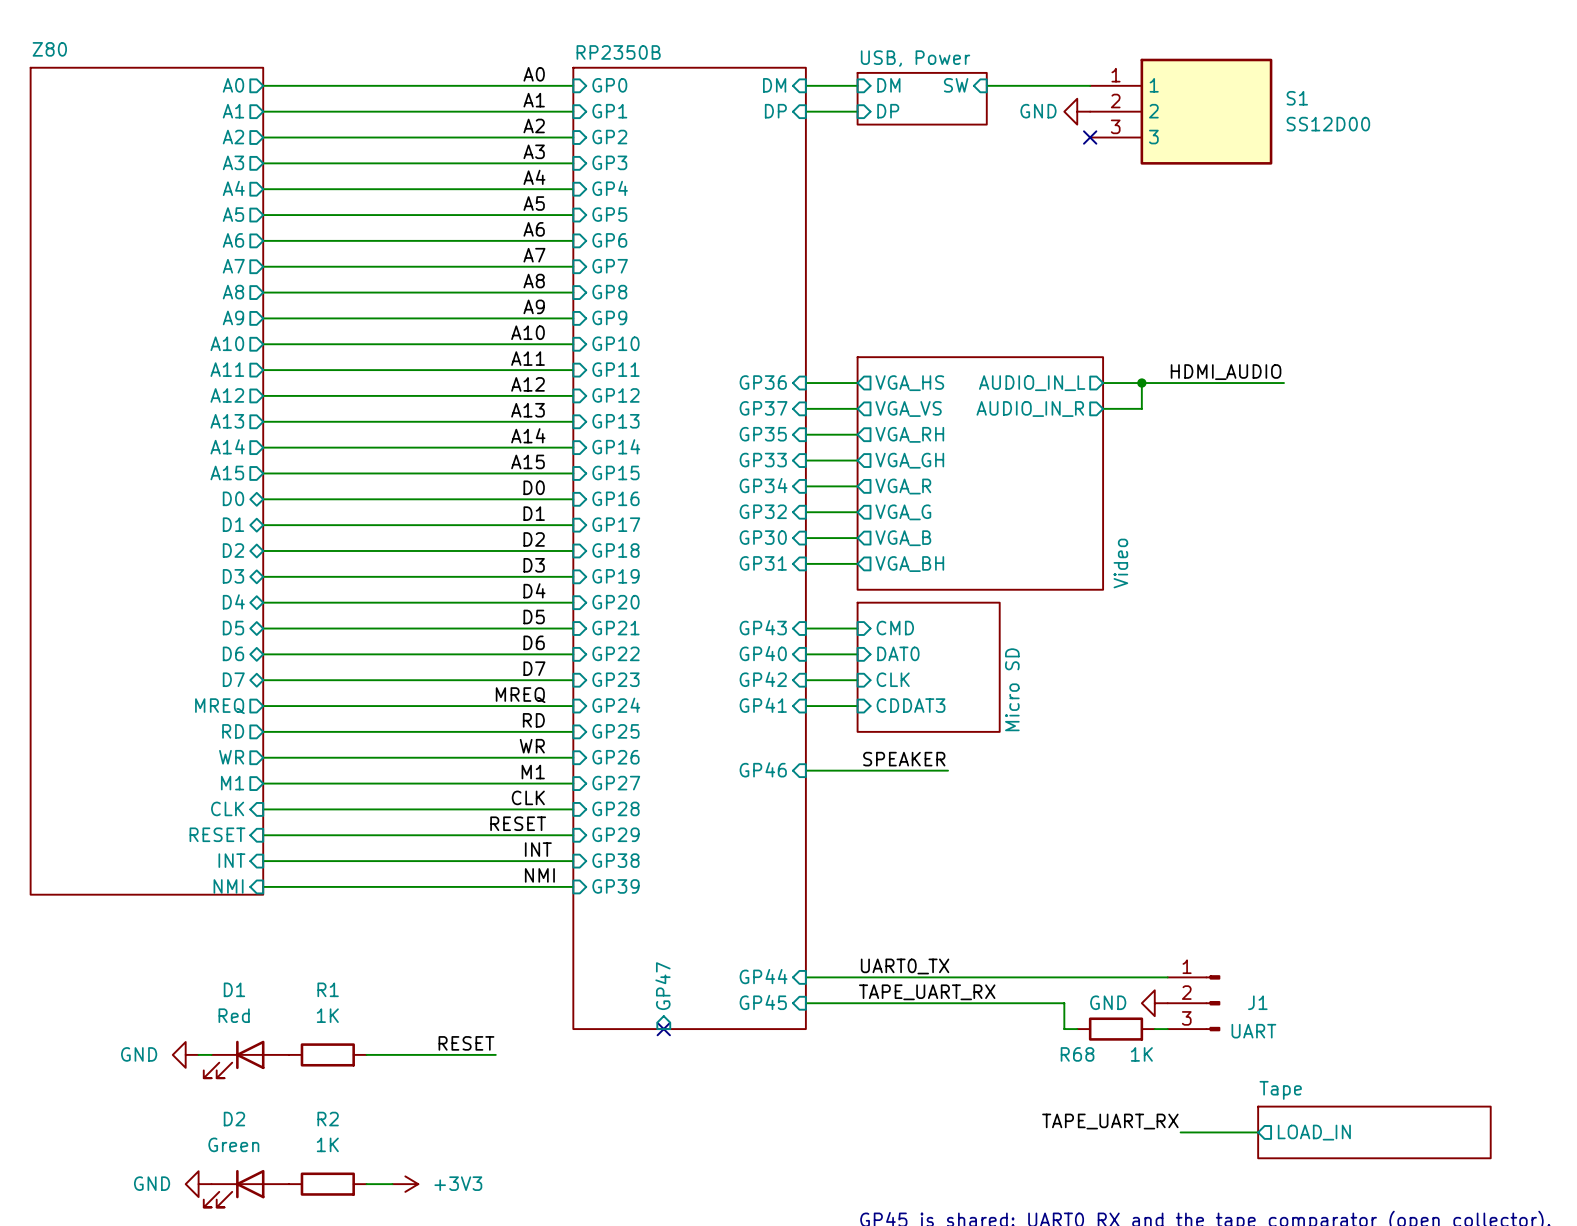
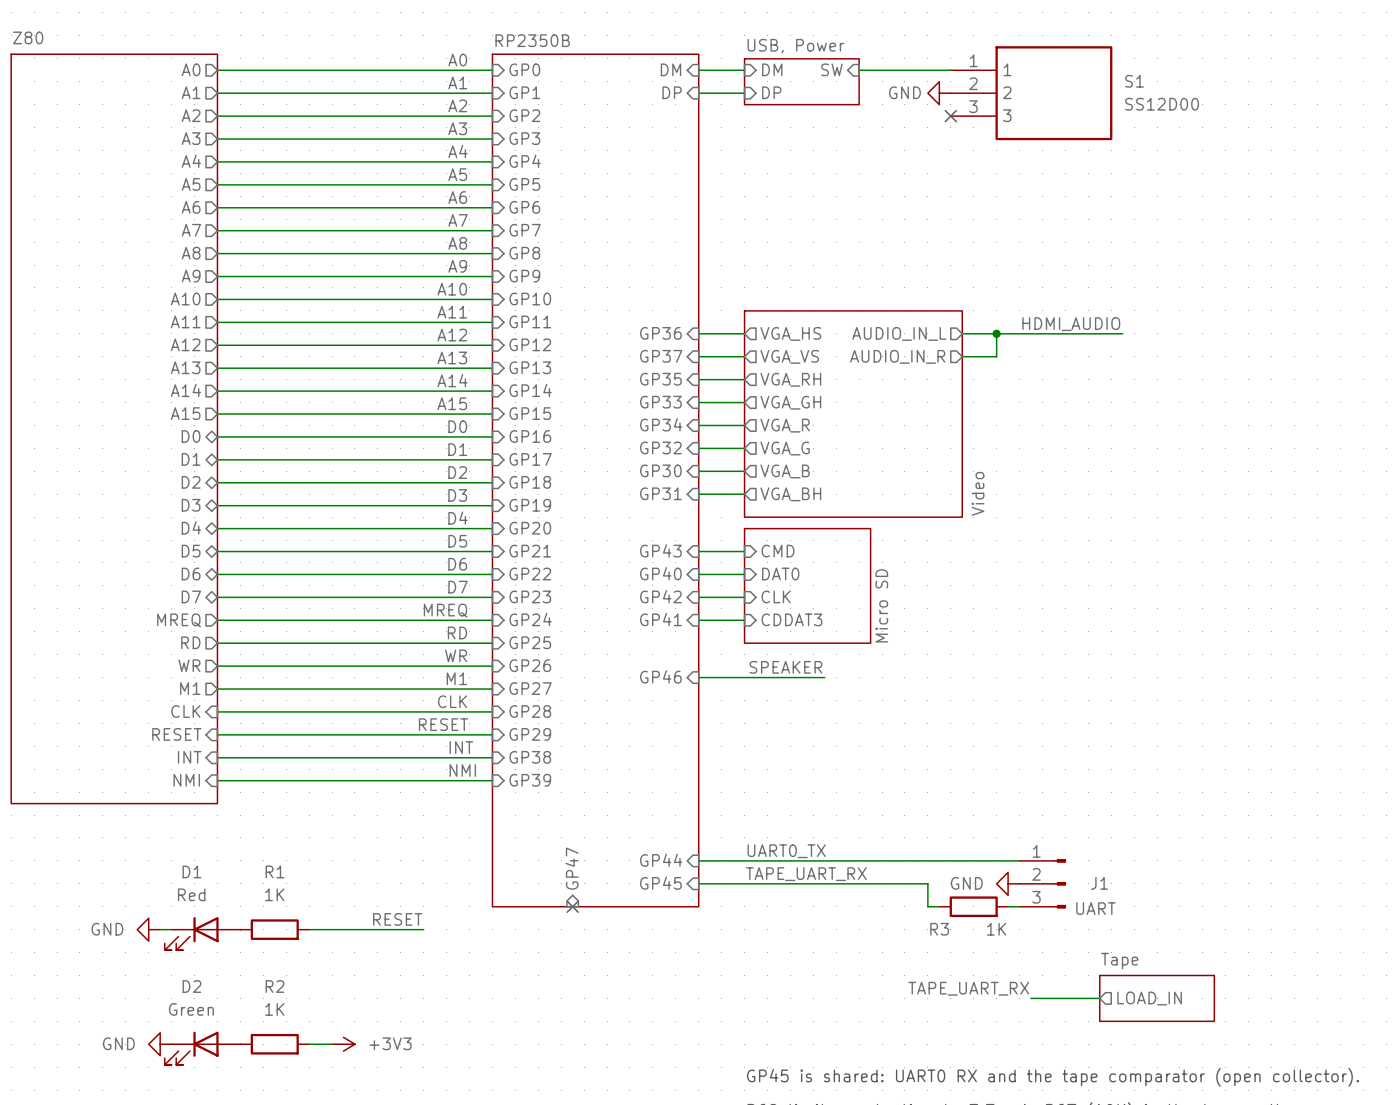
sheet Z80 shape: [29, 66, 264, 896] -> [10, 53, 219, 805]
R68 name: R68 (1077, 1054) -> R3 (939, 929)
sheet Tape: none -> (1157, 998)
sheet Tape: (1374, 1132) -> none

